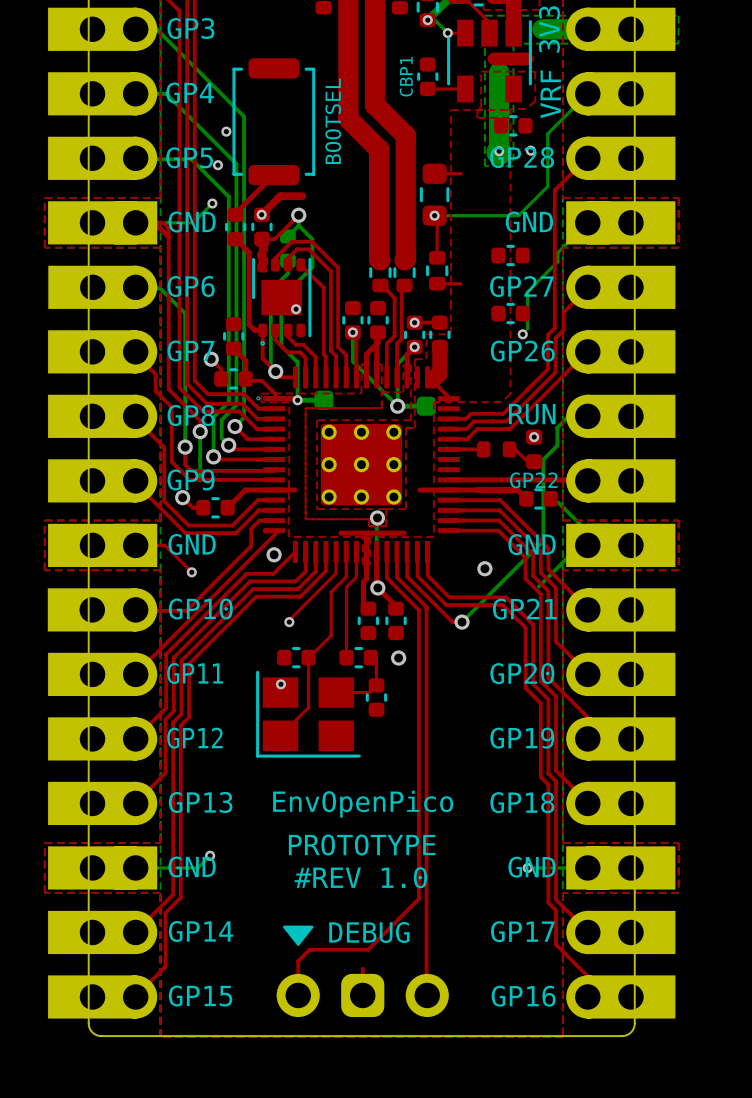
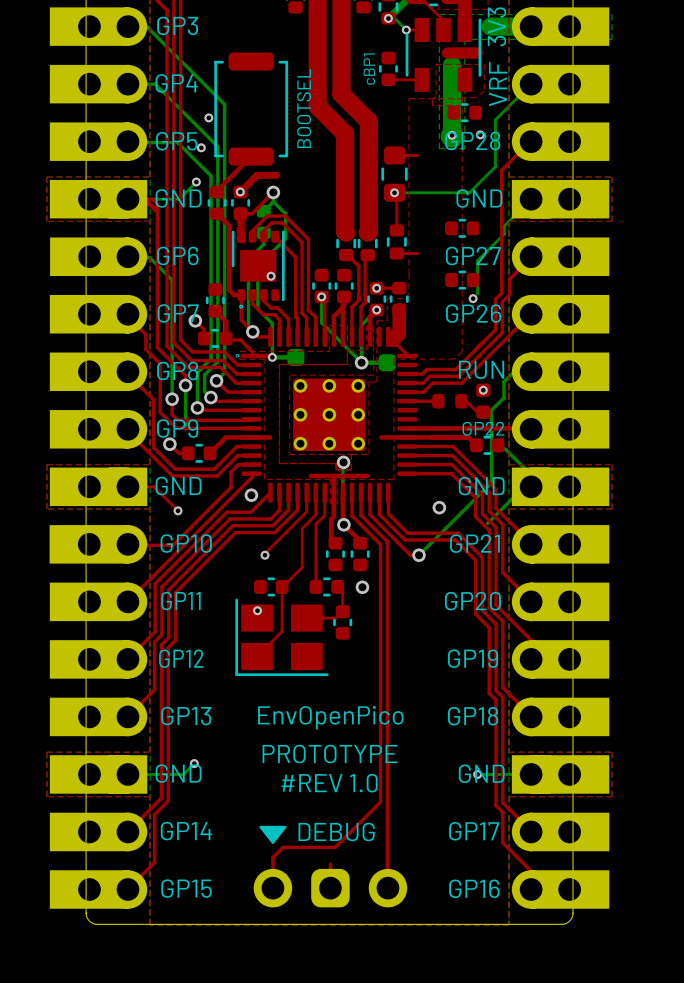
text: CBP1 (406, 76) -> cBP1 (369, 69)

